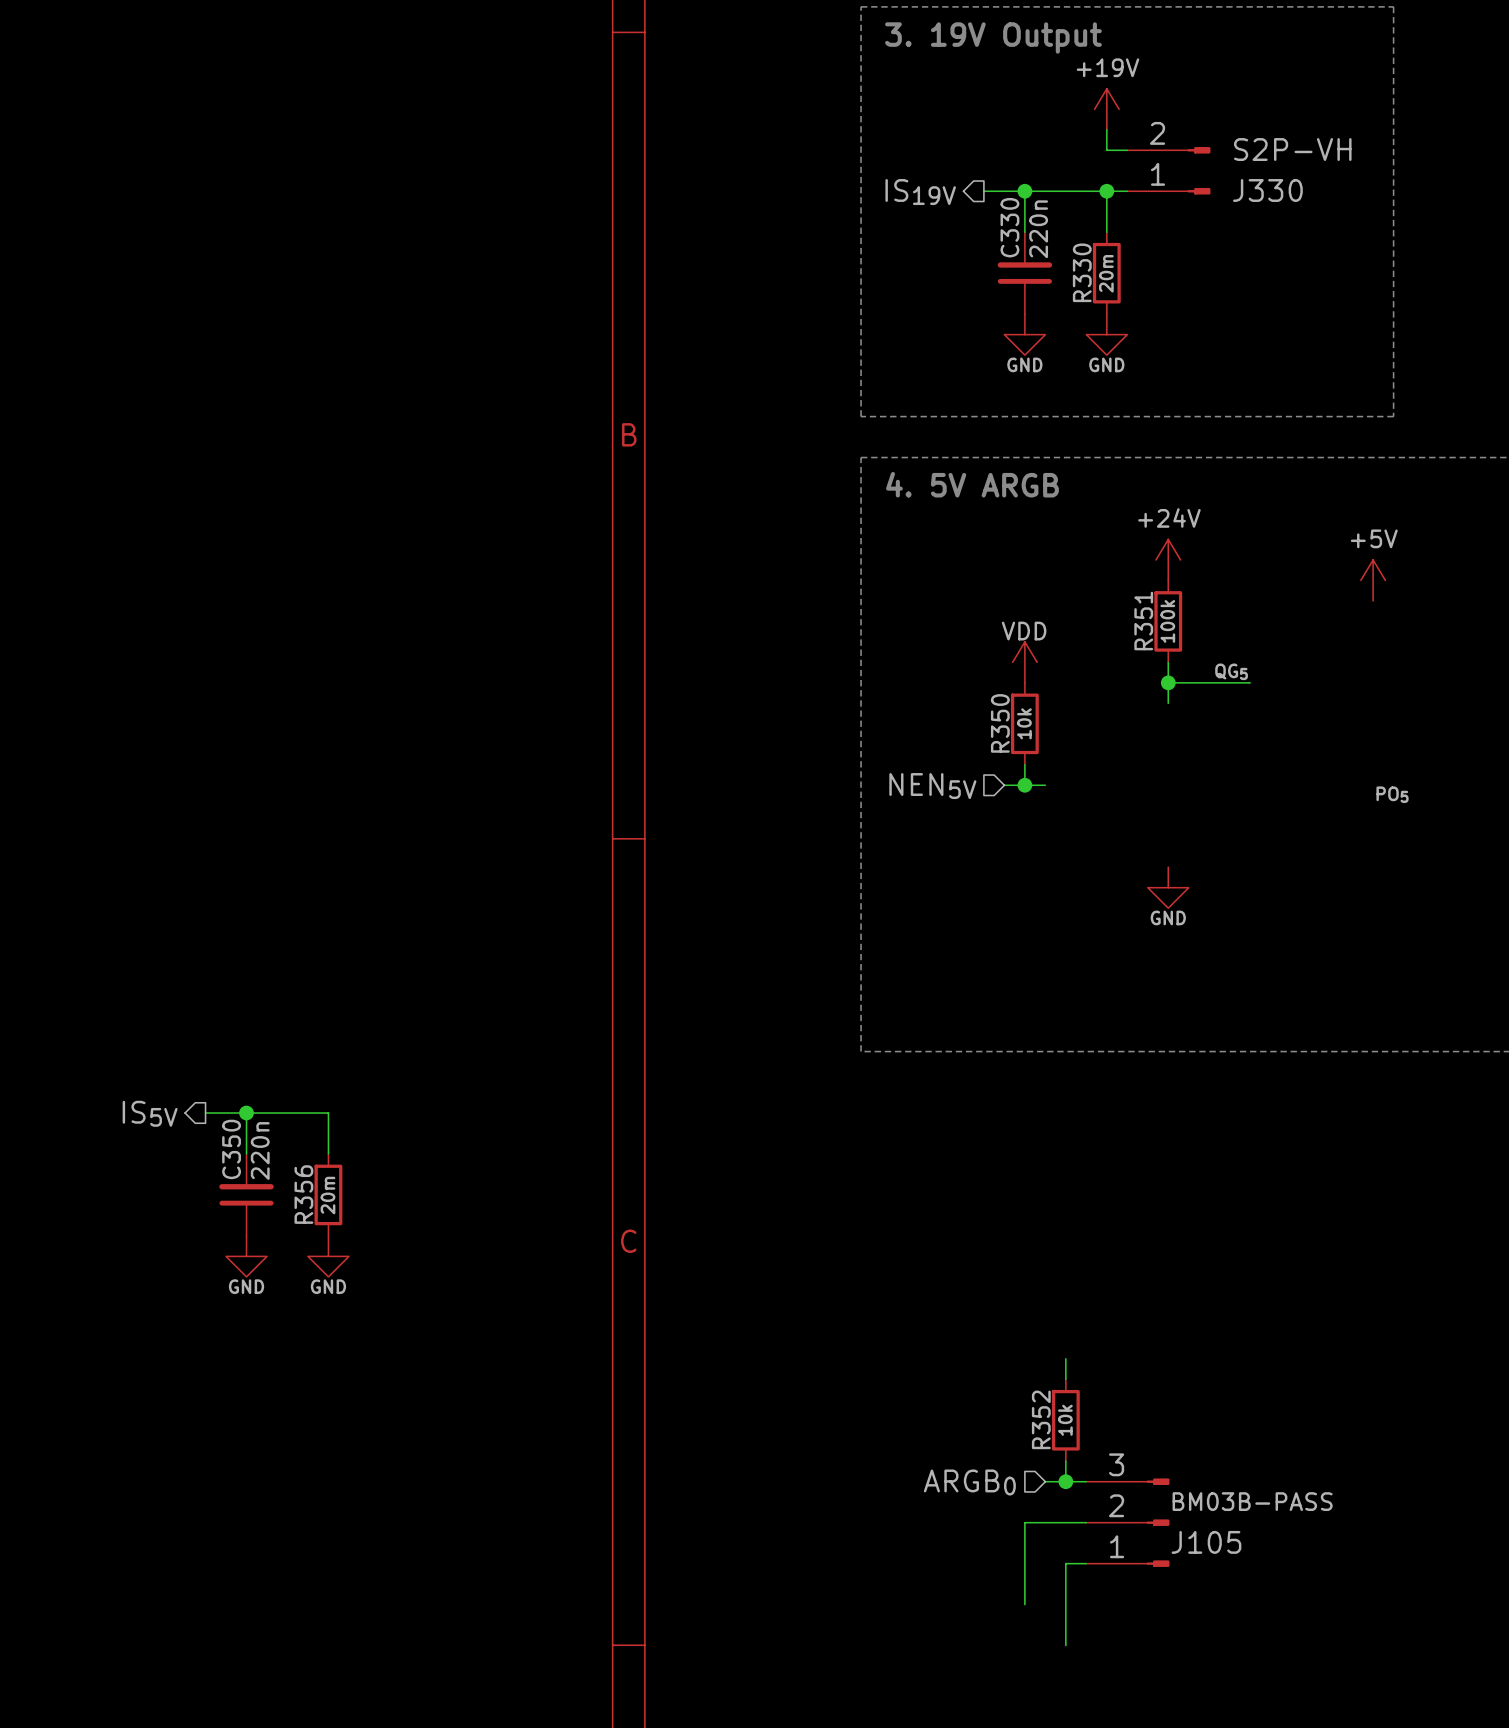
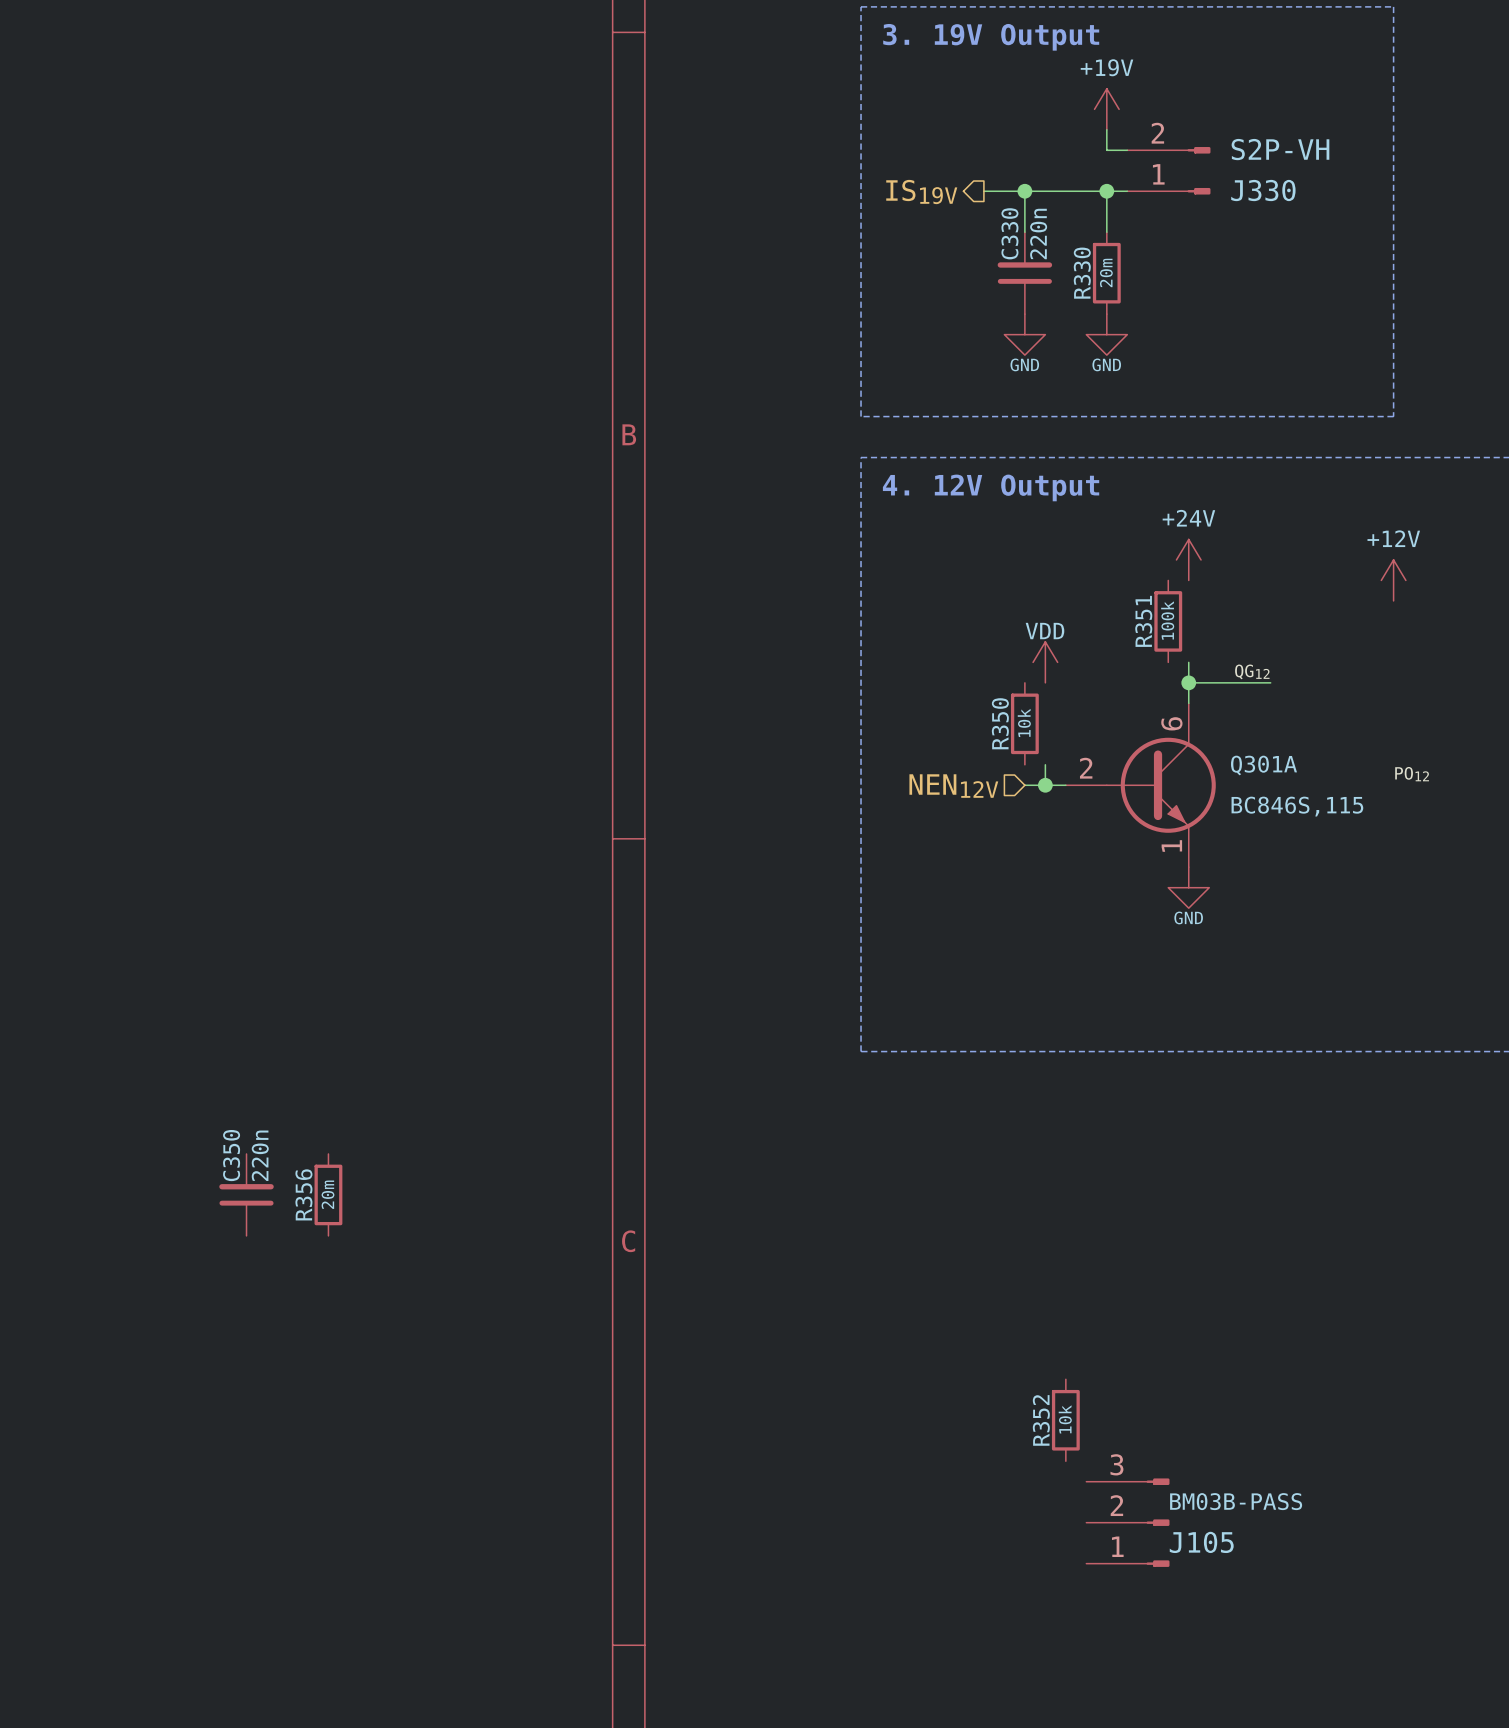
text: 4. 5V ARGB (972, 484) -> 4. 12V Output (991, 487)
power symbol position: +24V (1168, 559) -> +24V (1188, 559)
power symbol: +5V (1373, 580) -> none
power symbol: none -> +12V (1393, 580)
power symbol position: VDD (1024, 662) -> VDD (1045, 662)
wire: (1168, 662) (1168, 703) -> (1188, 662) (1188, 703)
label: QG5 (1231, 671) -> QG12 (1252, 671)
wire: (1168, 682) (1188, 682) -> (1250, 682) (1270, 682)
junction position: (1168, 682) -> (1188, 682)
wire: (1024, 764) (1024, 785) (1004, 785) -> none
wire: none -> (1045, 764) (1045, 785) (1065, 785)
junction position: (1024, 785) -> (1045, 785)
Q301A: none -> BC846S,115 (1140, 785)
hierarchical label: NEN5V (932, 786) -> NEN12V (953, 786)
label: PO5 (1392, 794) -> PO12 (1412, 774)
power symbol position: GND (1168, 887) -> GND (1188, 887)
hierarchical label: IS5V (150, 1113) -> none
wire: (205, 1113) (328, 1113) (328, 1153) -> none
wire: (246, 1113) (246, 1153) -> none
junction: (246, 1113) -> none
power symbol: GND (246, 1256) -> none
power symbol: GND (328, 1256) -> none
wire: (1065, 1358) (1065, 1379) -> none
wire: (1065, 1461) (1065, 1481) -> none
wire: (1045, 1481) (1086, 1481) -> none
junction: (1065, 1481) -> none
hierarchical label: ARGB0 (969, 1482) -> none
wire: (1086, 1522) (1024, 1522) (1024, 1604) -> none
wire: (1086, 1563) (1065, 1563) (1065, 1645) -> none

